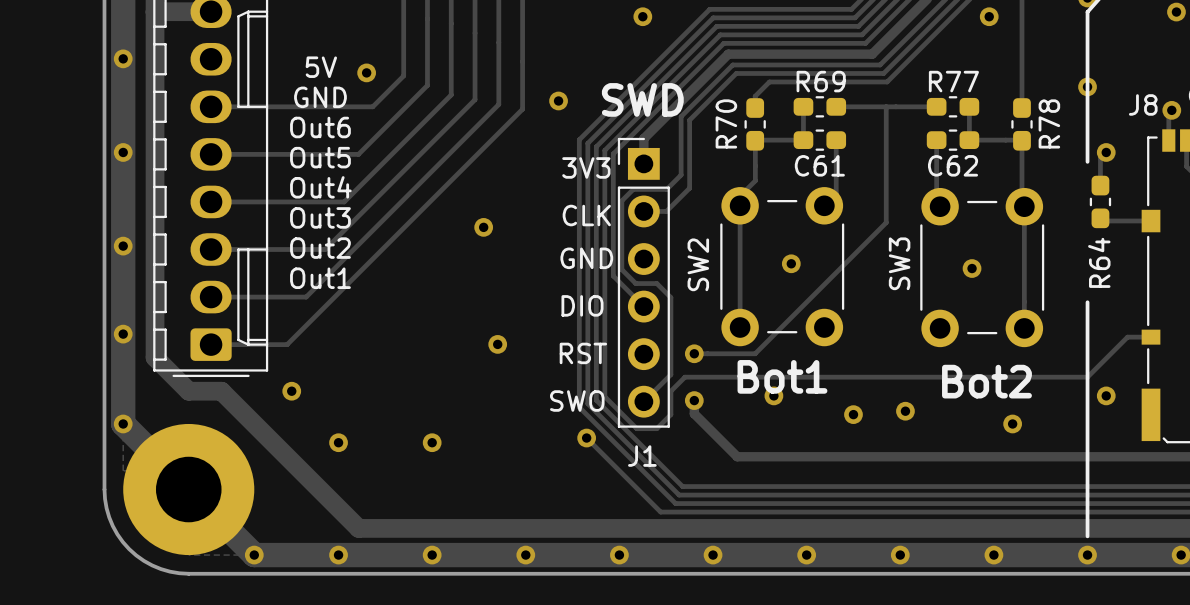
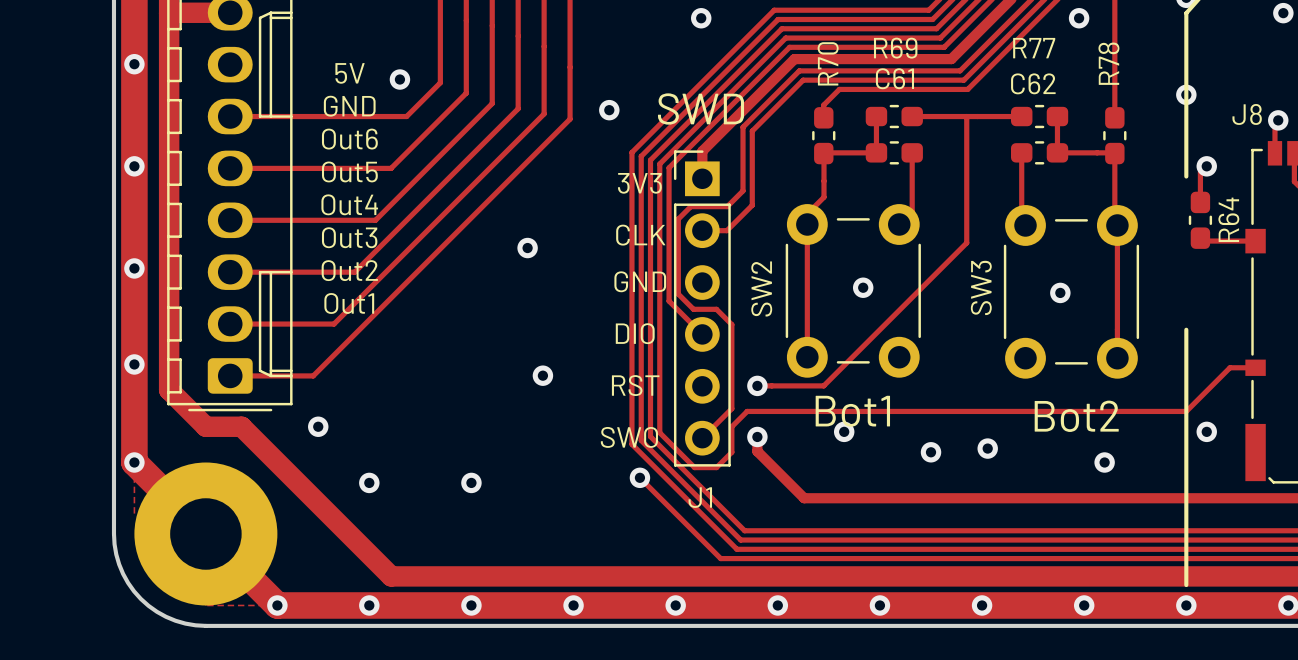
R69 name position: R69 (821, 81) -> R69 (895, 48)
R77 name position: R77 (953, 81) -> R77 (1034, 48)
R70 name position: R70 (726, 123) -> R70 (828, 63)
R78 name position: R78 (1049, 123) -> R78 (1108, 63)
C61 name position: C61 (819, 165) -> C61 (894, 78)
C62 name position: C62 (953, 165) -> C62 (1033, 83)
R64 name position: R64 (1099, 262) -> R64 (1228, 219)

